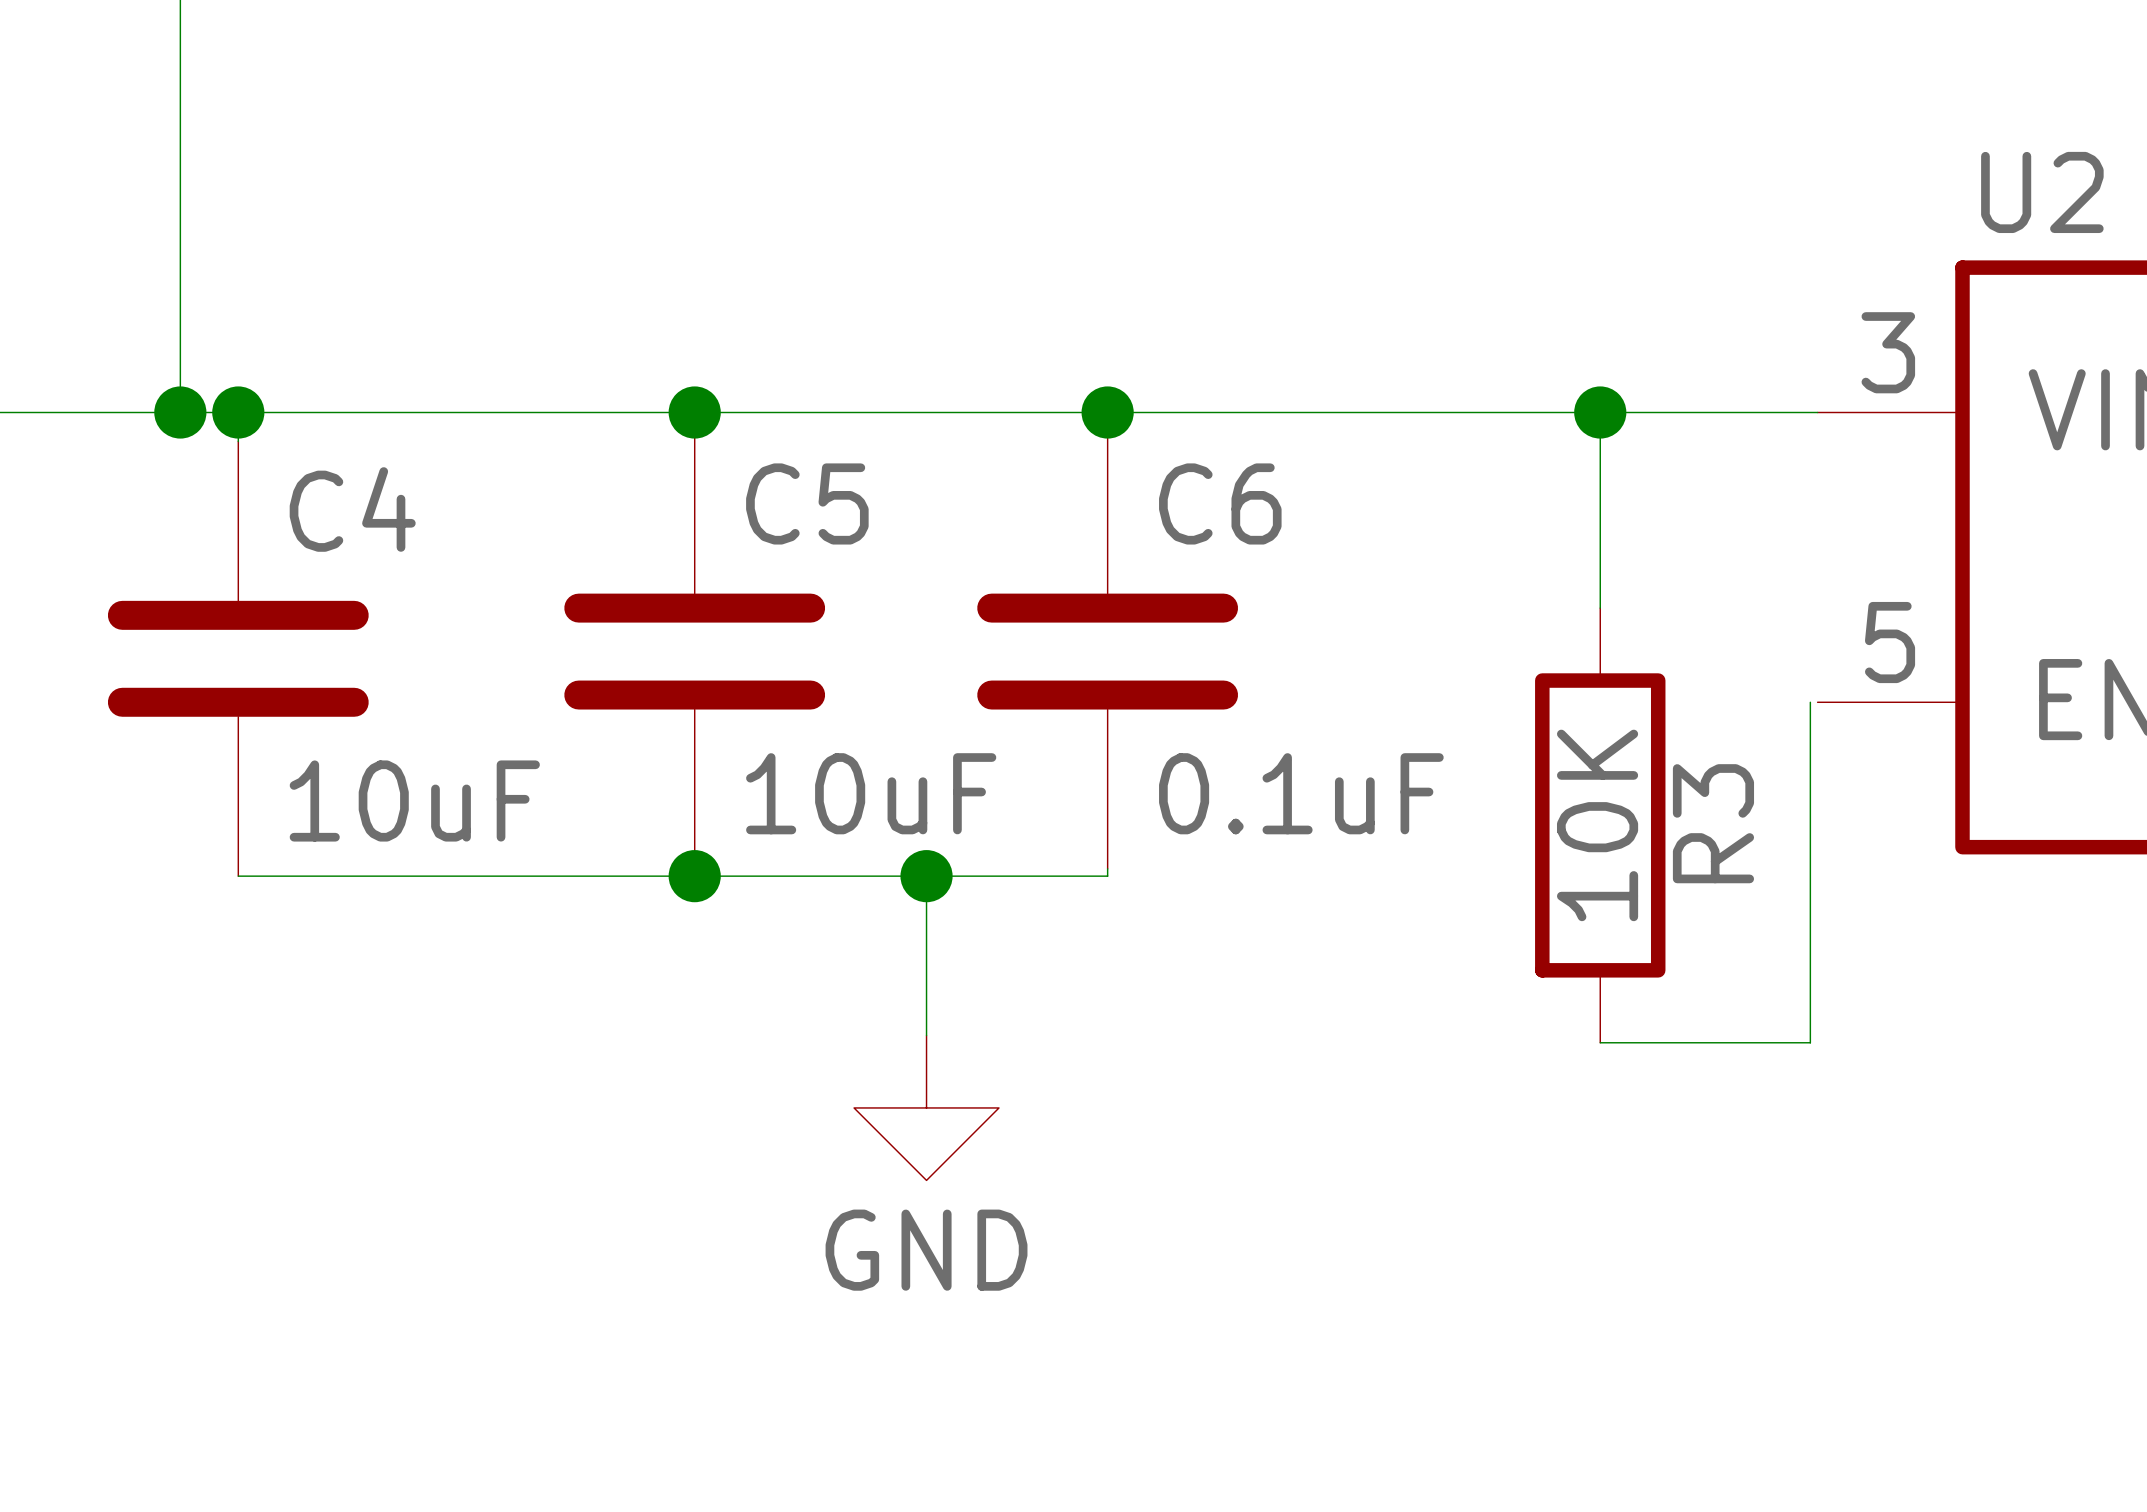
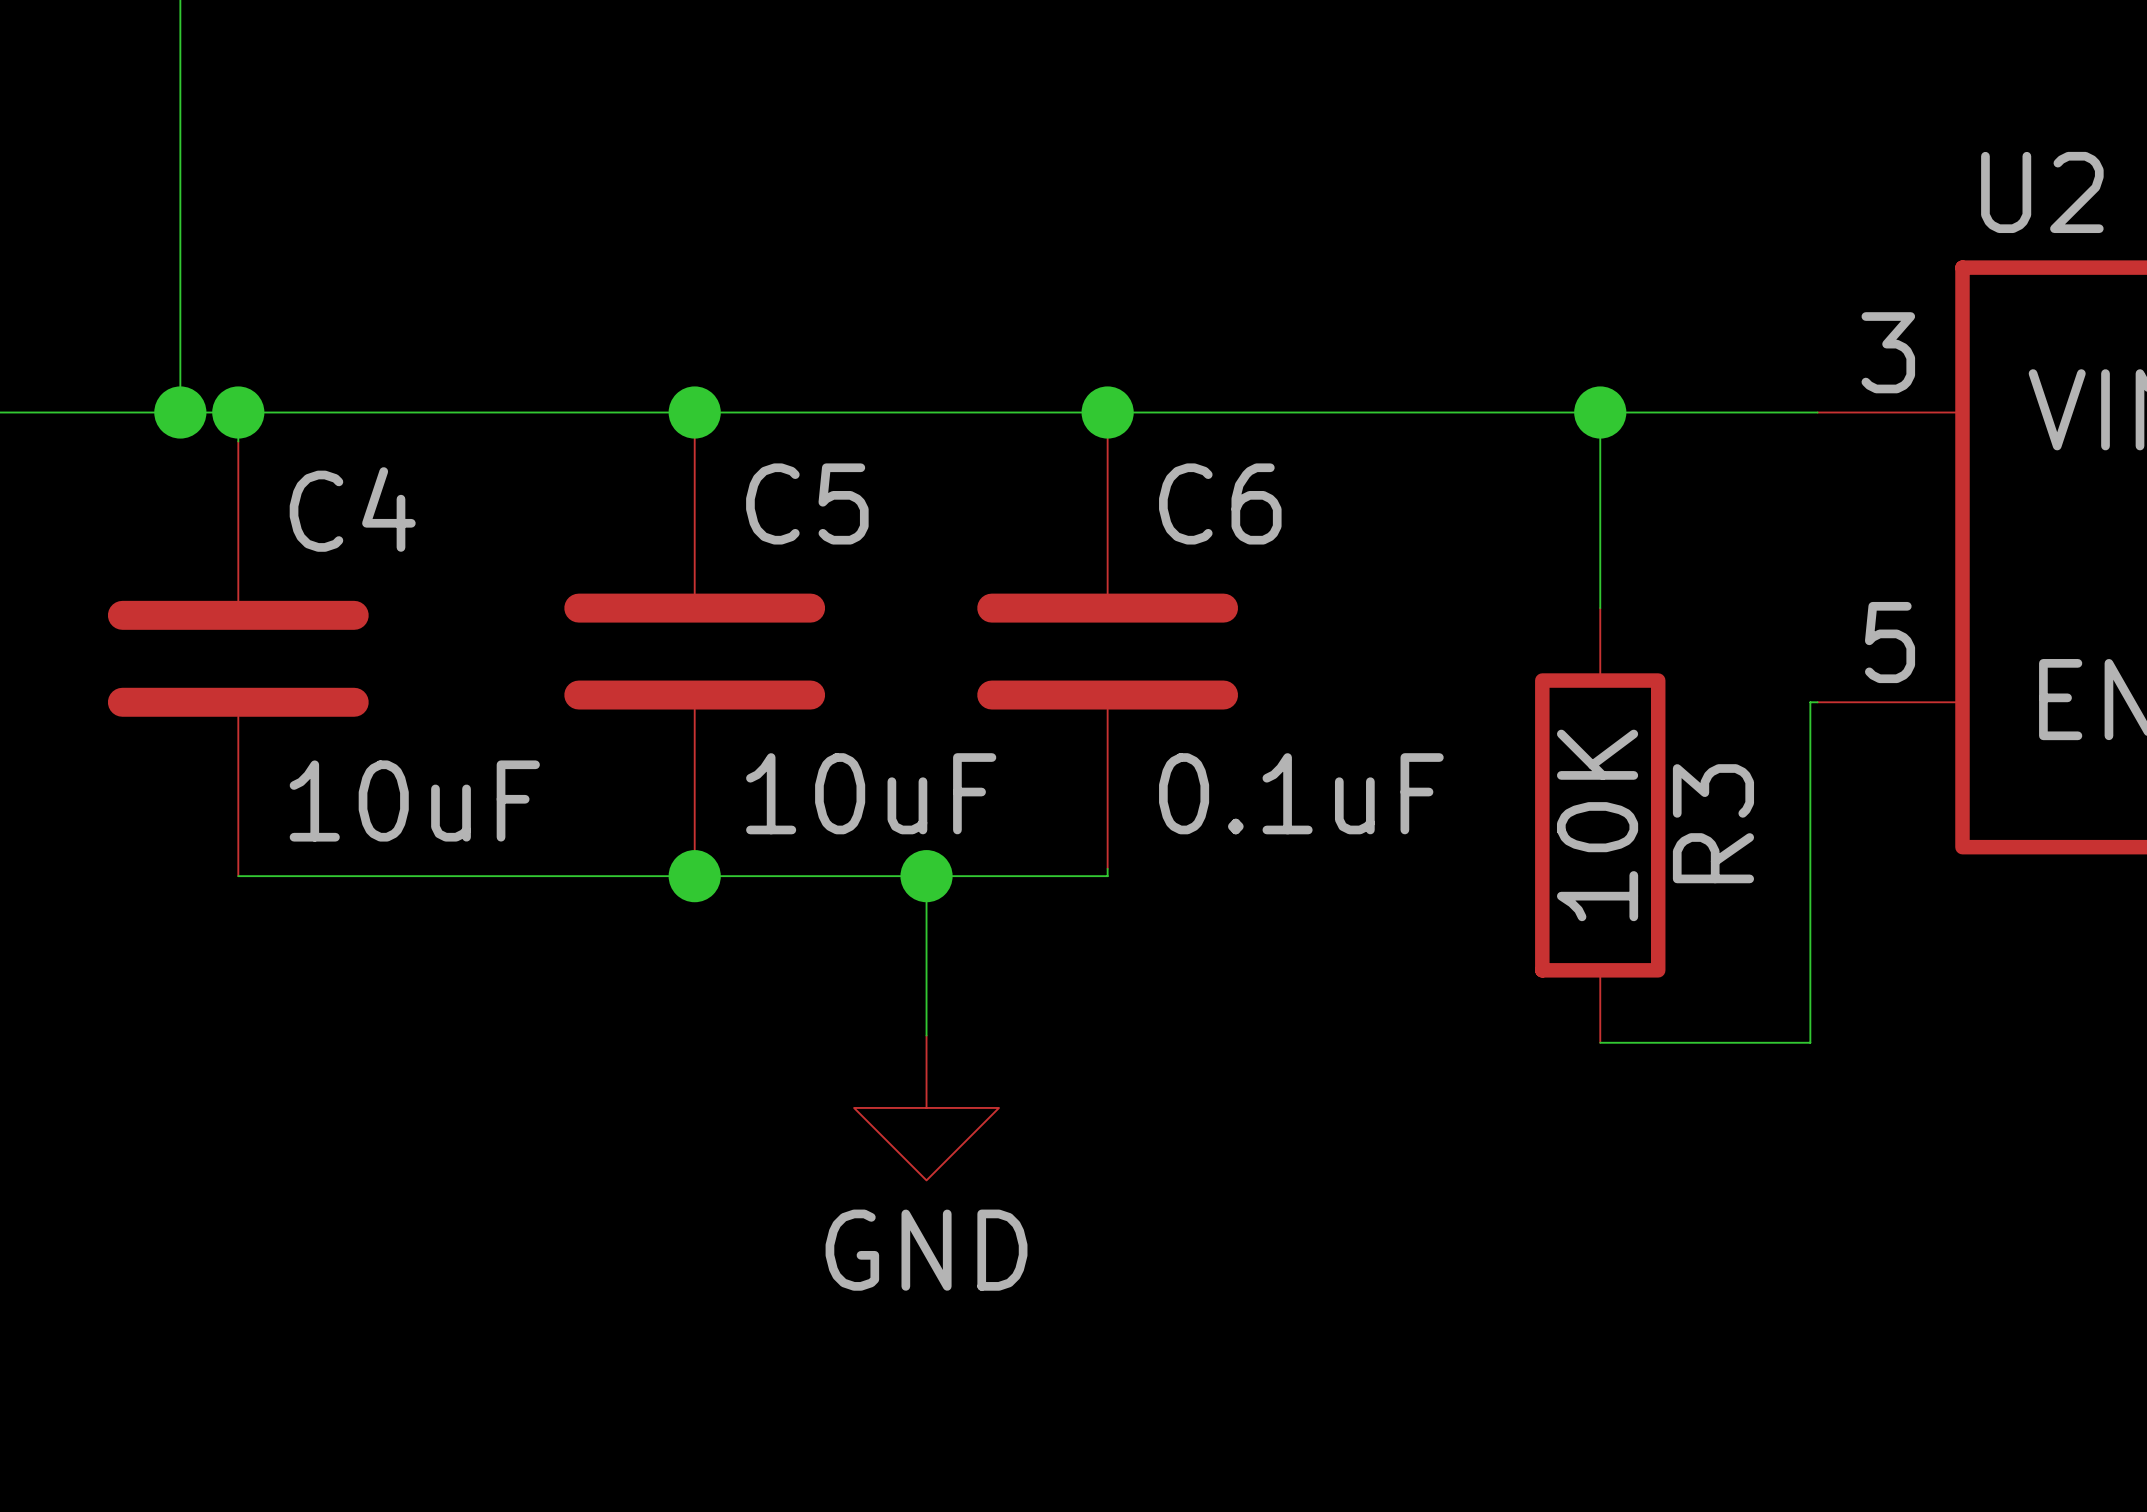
wire: none -> (1810, 702) (1817, 702)

